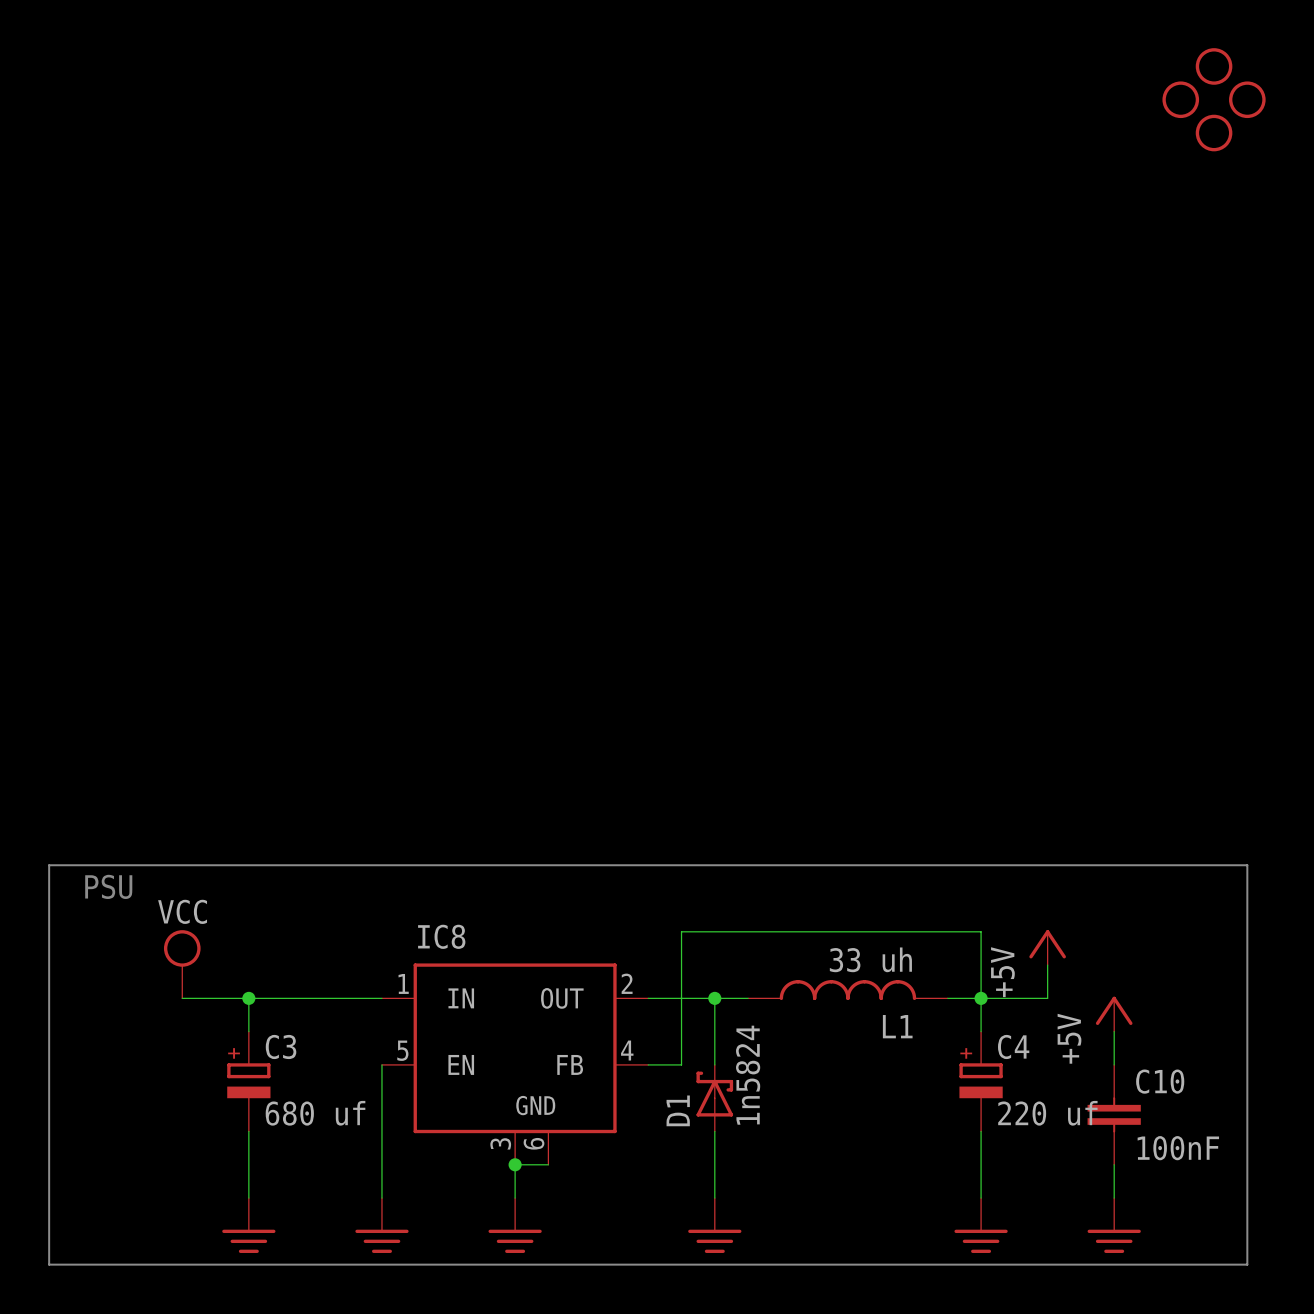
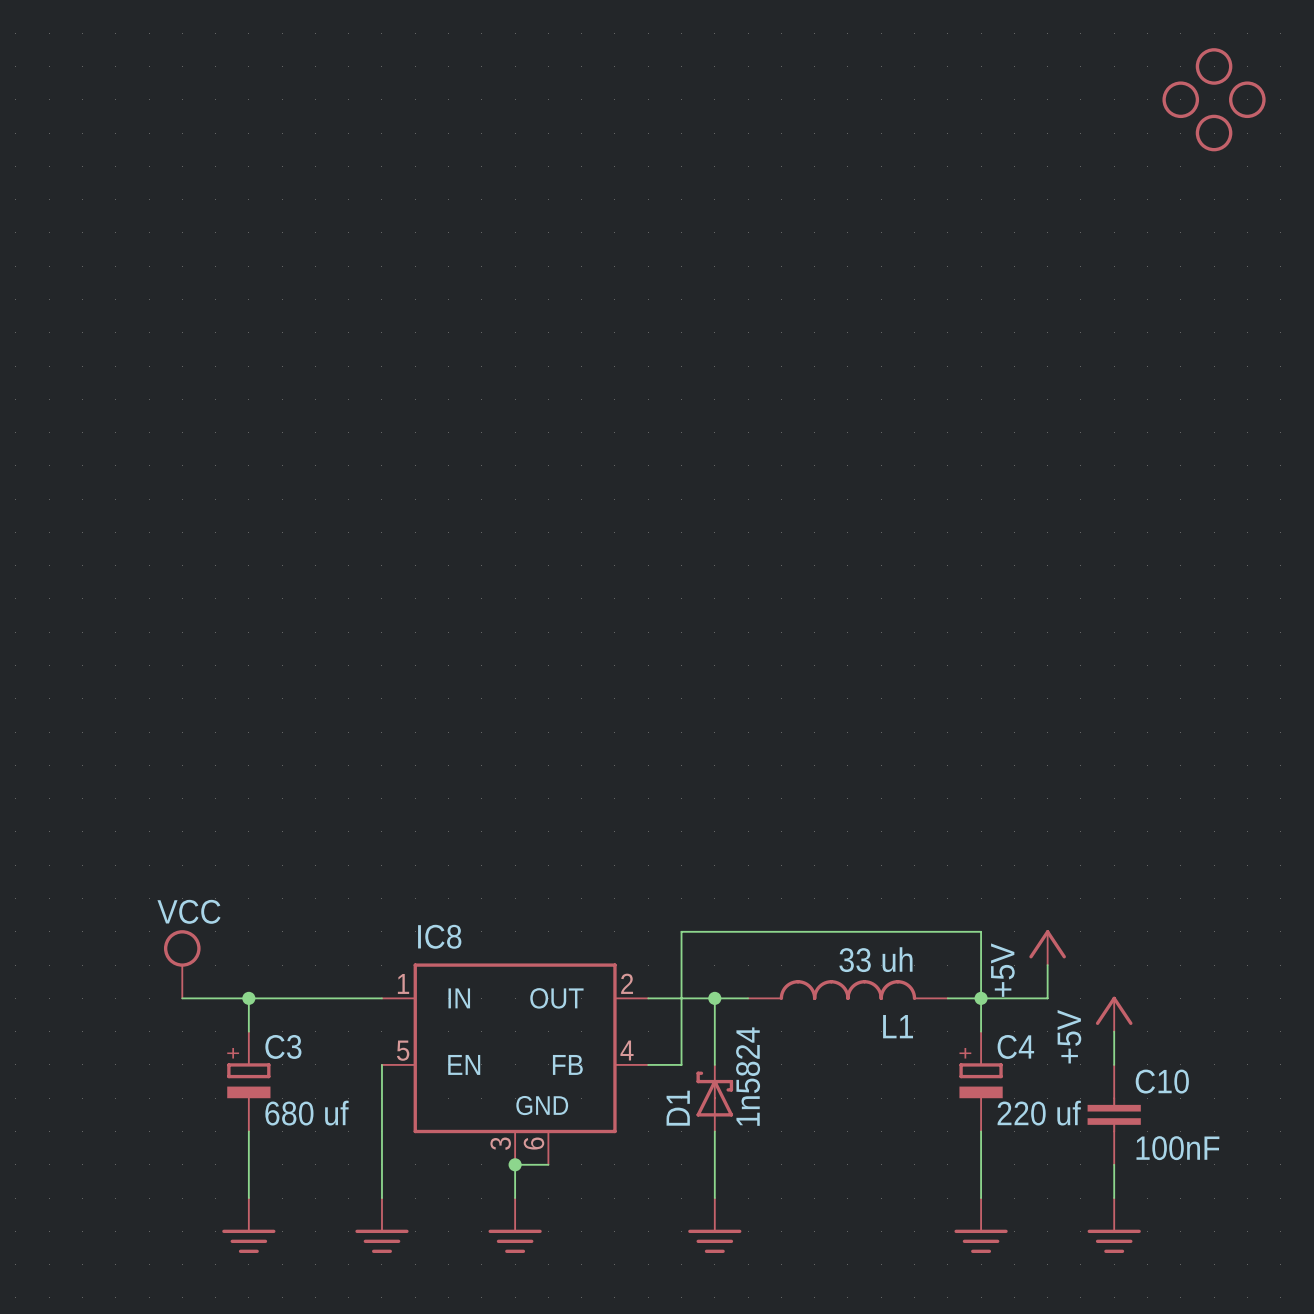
line: (49, 865) (1247, 865) (1247, 1264) (49, 1264) (49, 865) -> none
text: PSU (108, 886) -> none

